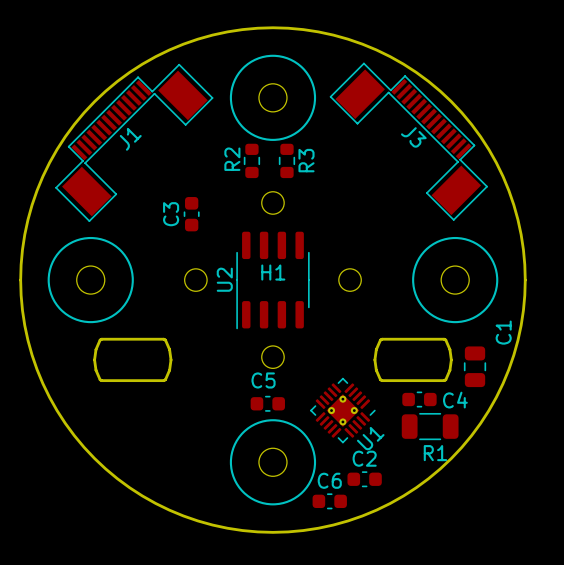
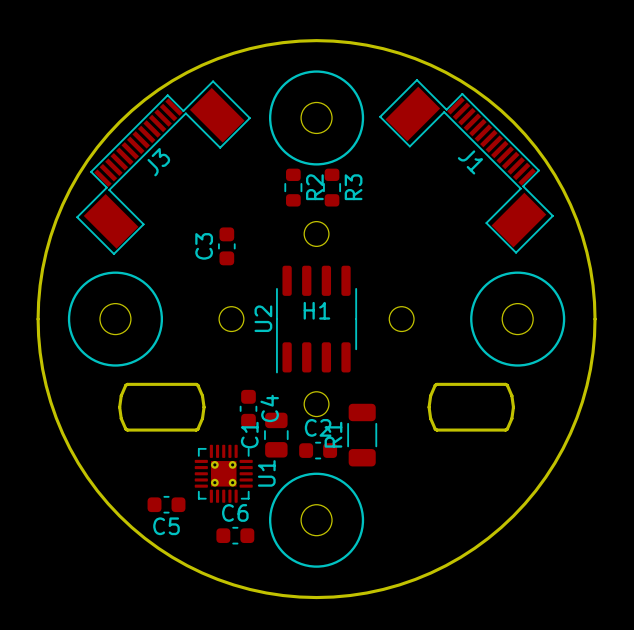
J3 name: J3 (413, 137) -> J1 (470, 162)
J1 name: J1 (130, 139) -> J3 (158, 162)
R2 name position: R2 (232, 159) -> R2 (314, 187)
C1 name position: C1 (503, 332) -> C1 (249, 435)
C1 position: (475, 366) -> (276, 435)
C5 name position: C5 (263, 380) -> C5 (166, 526)
C4 rotation: 0° (419, 399) -> 90° clockwise (248, 408)
C4 position: (419, 399) -> (248, 408)
C5 position: (267, 403) -> (166, 504)
U1 rotation: 0° (342, 410) -> 45° counterclockwise (223, 473)
U1 position: (342, 410) -> (223, 473)
R1 rotation: 0° (430, 426) -> 90° clockwise (362, 435)
R1 position: (430, 426) -> (362, 435)
C2 position: (364, 479) -> (318, 450)
C6 position: (329, 501) -> (235, 535)

